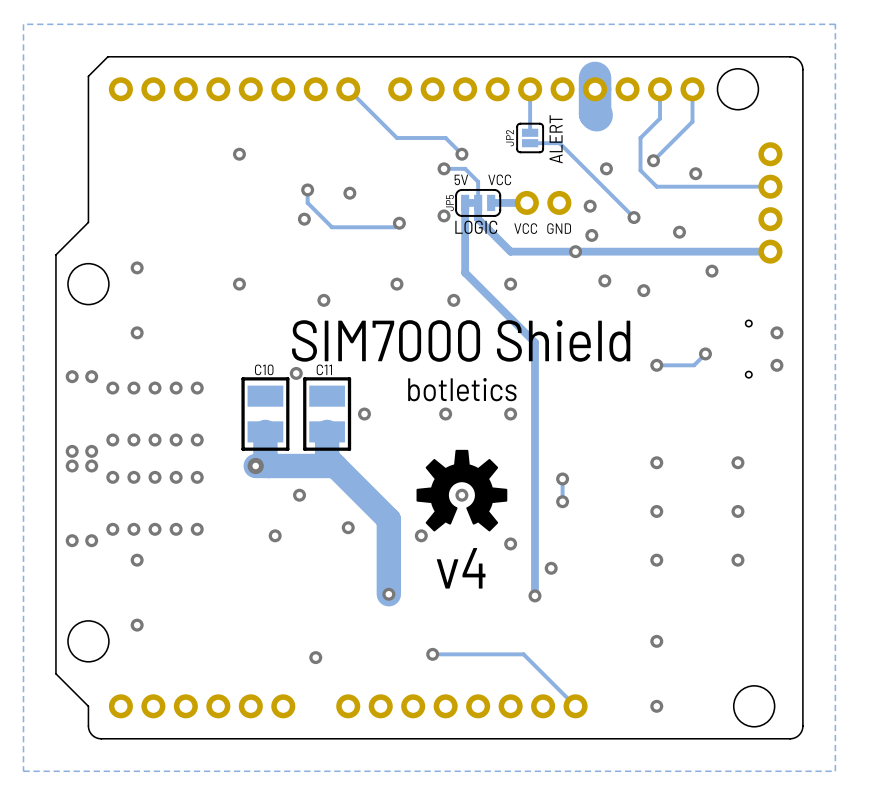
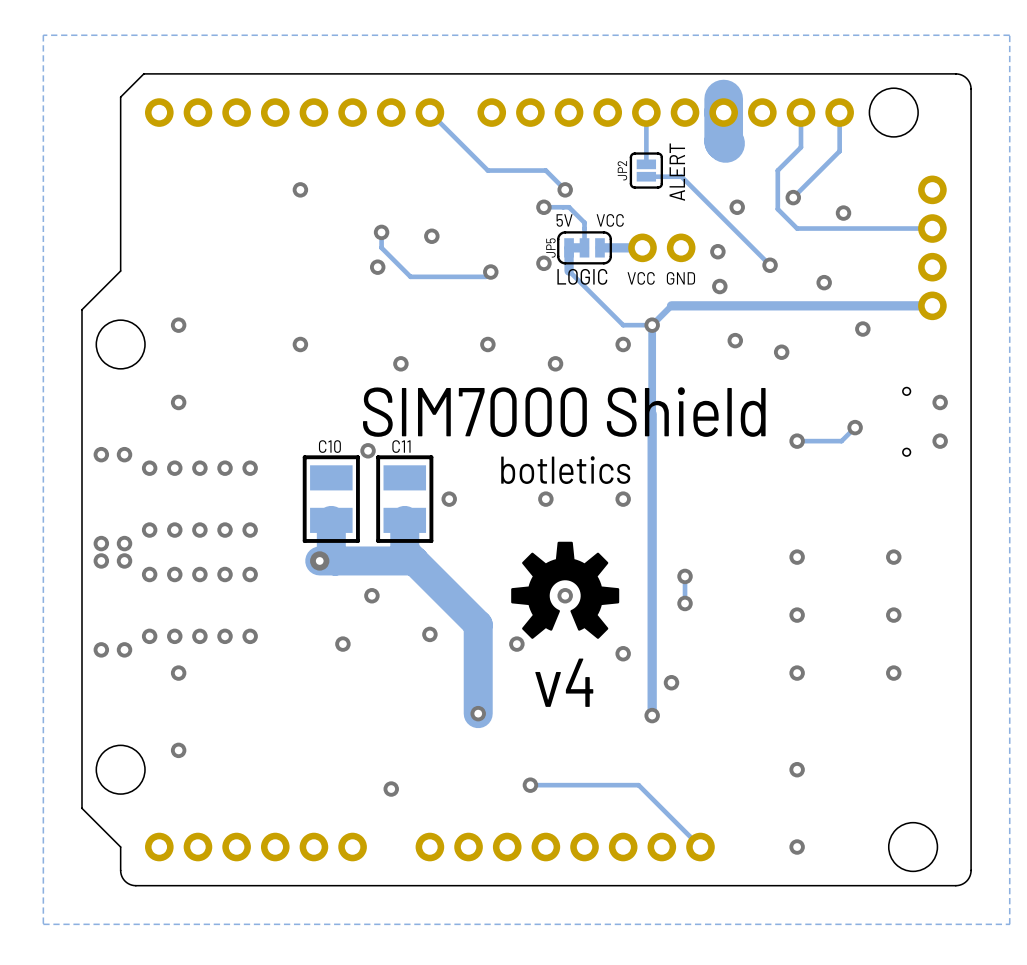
track: (478, 202) (478, 219) (510, 251) (551, 251) -> (652, 325) (671, 305)
track: (465, 222) (465, 272) (534, 342) -> (569, 271) (623, 325) (652, 325)
via position: (575, 251) -> (652, 325)
track: none -> (652, 325) (652, 414)

